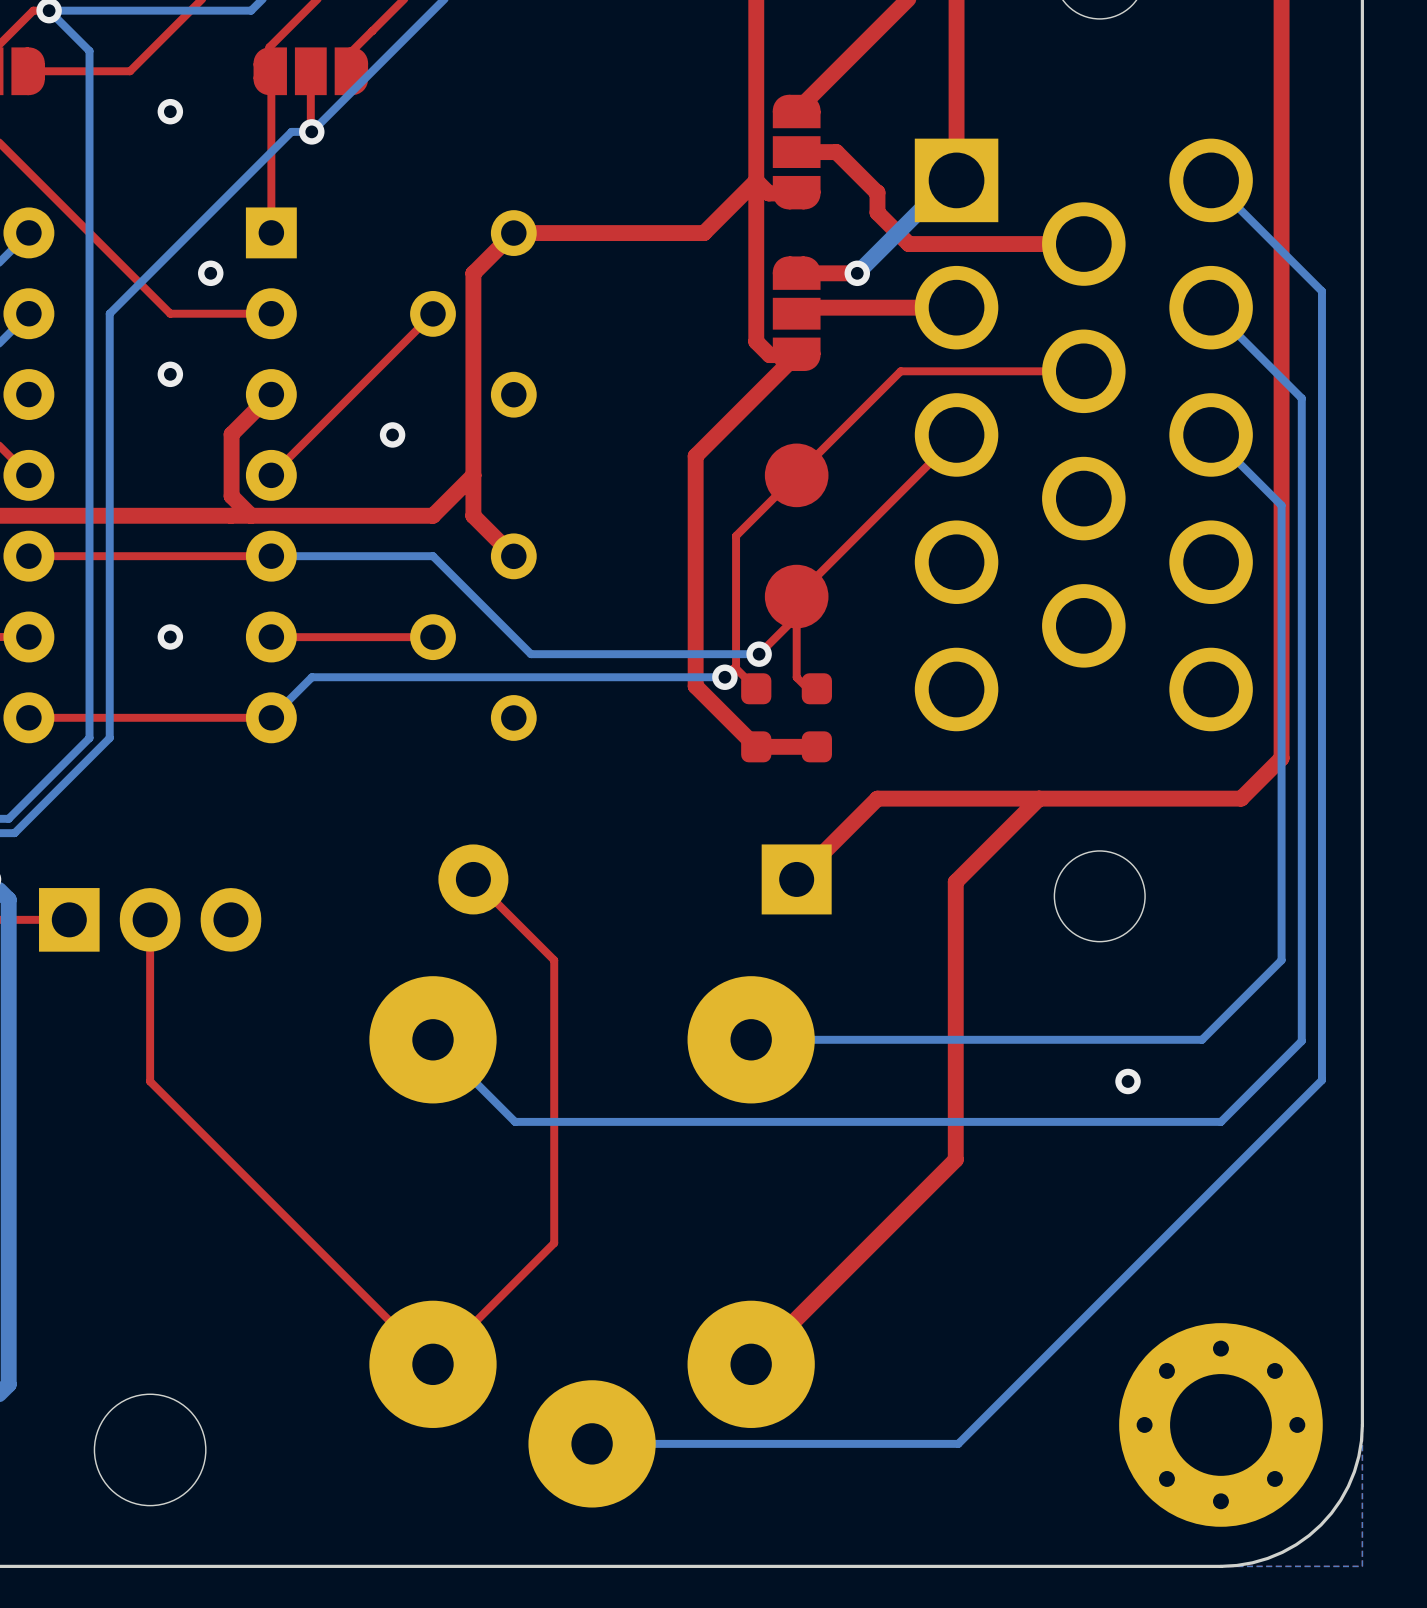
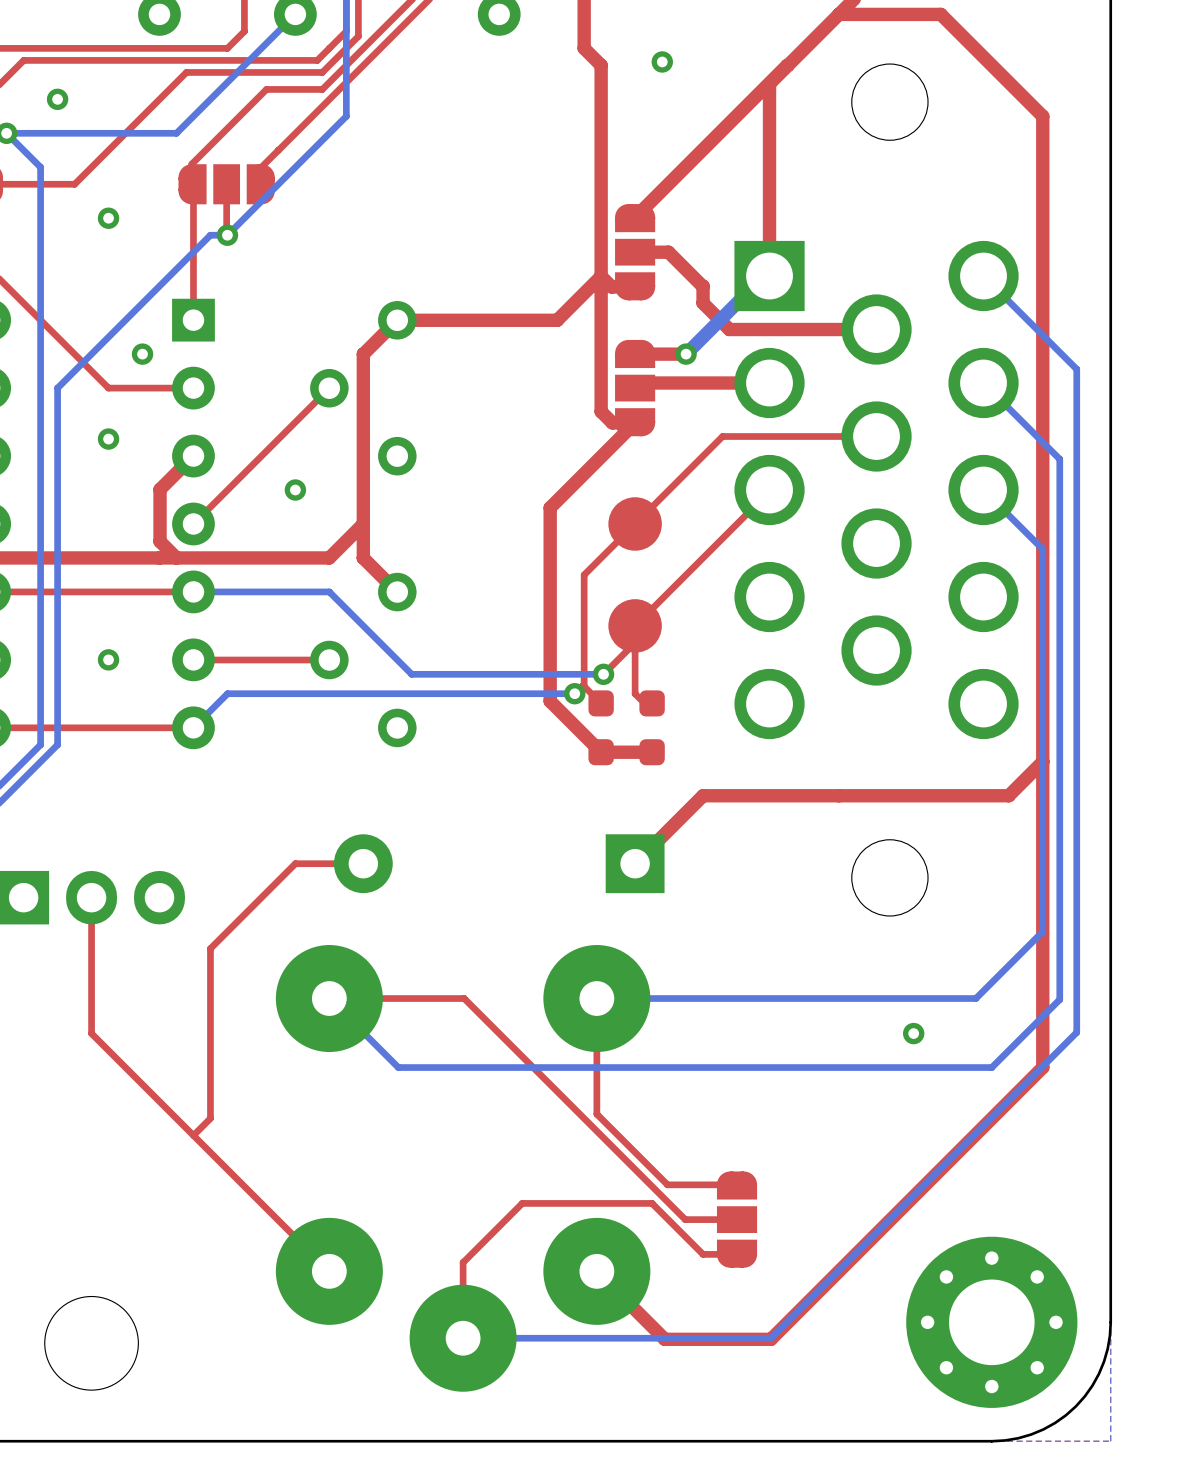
top track: (1039, 798) (955, 881) (955, 1159) (751, 1364) -> (1042, 761) (1042, 1067) (771, 1339) (664, 1339) (596, 1271)
top track: (473, 879) (554, 960) (554, 1243) (432, 1364) -> (363, 863) (295, 863) (210, 948) (210, 1118) (193, 1135)
top track: none -> (329, 998) (464, 998) (685, 1219) (737, 1219)
top track: none -> (596, 998) (596, 1114) (667, 1184) (737, 1184)
part: none -> (737, 1219)
top track: none -> (737, 1254) (703, 1254) (652, 1203) (522, 1203) (463, 1262) (463, 1338)

